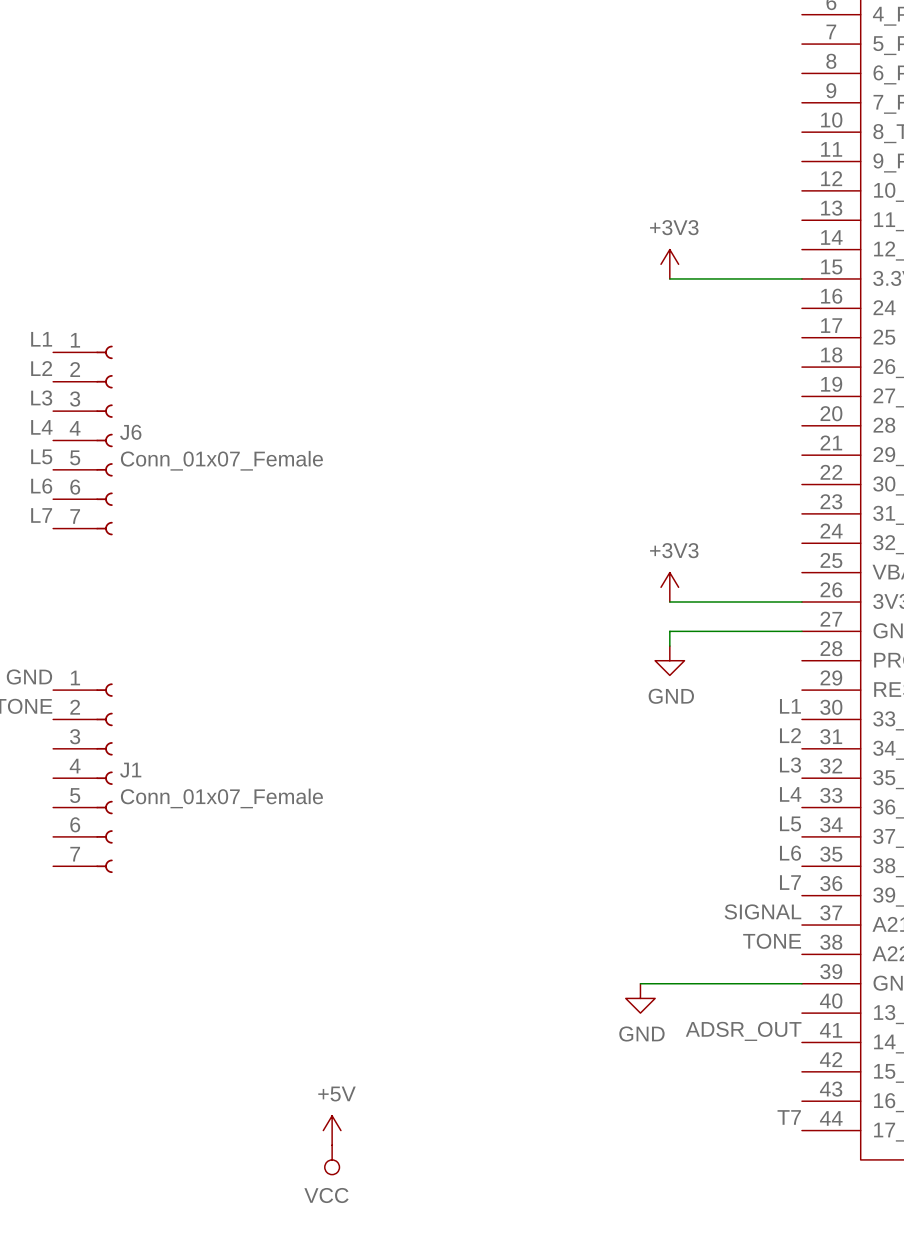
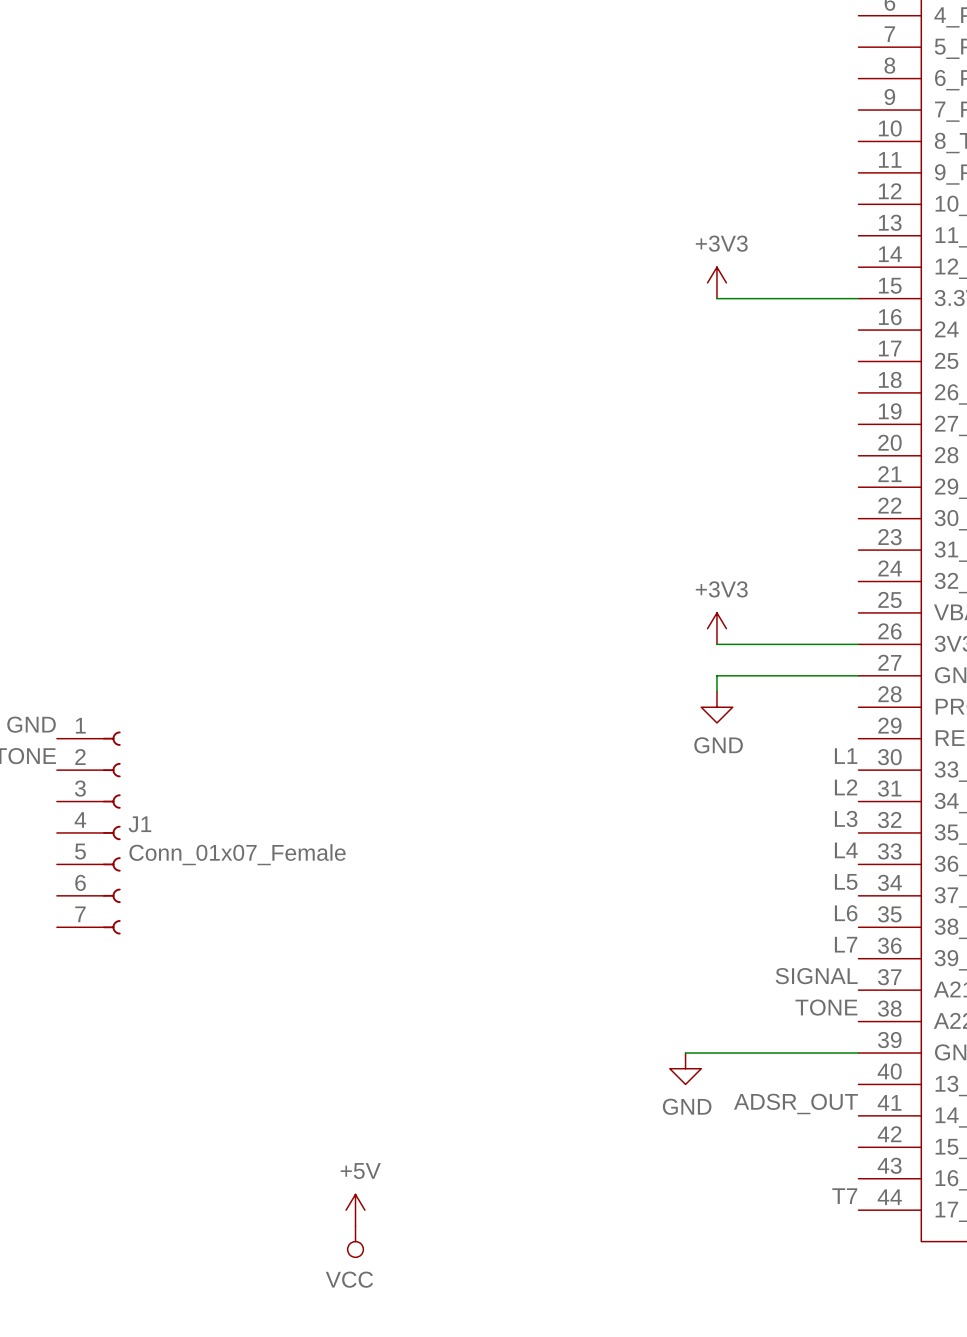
label: L1 (41, 339) -> none
label: L2 (41, 368) -> none
label: L3 (41, 398) -> none
label: L4 (41, 427) -> none
J6: Conn_01x07_Female (82, 440) -> none
label: L5 (41, 456) -> none
label: L6 (41, 486) -> none
label: L7 (41, 515) -> none

